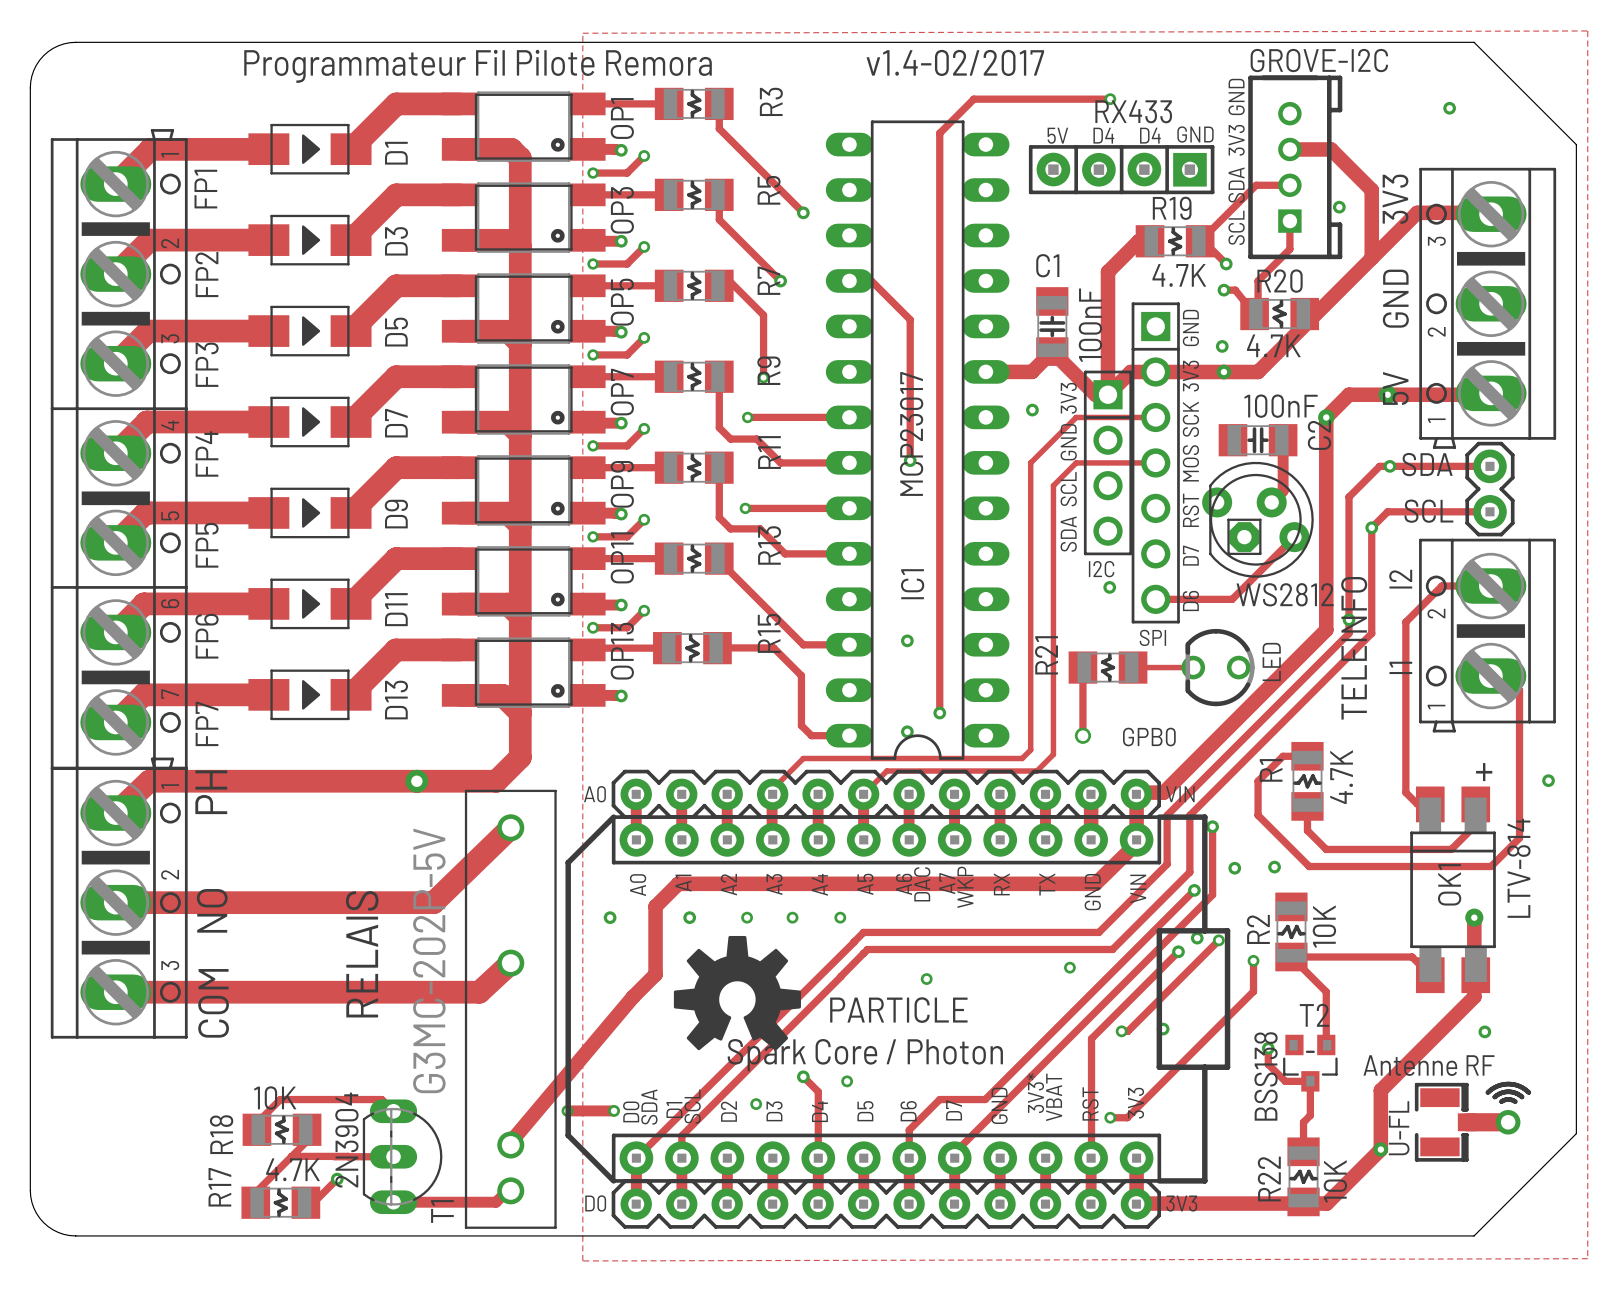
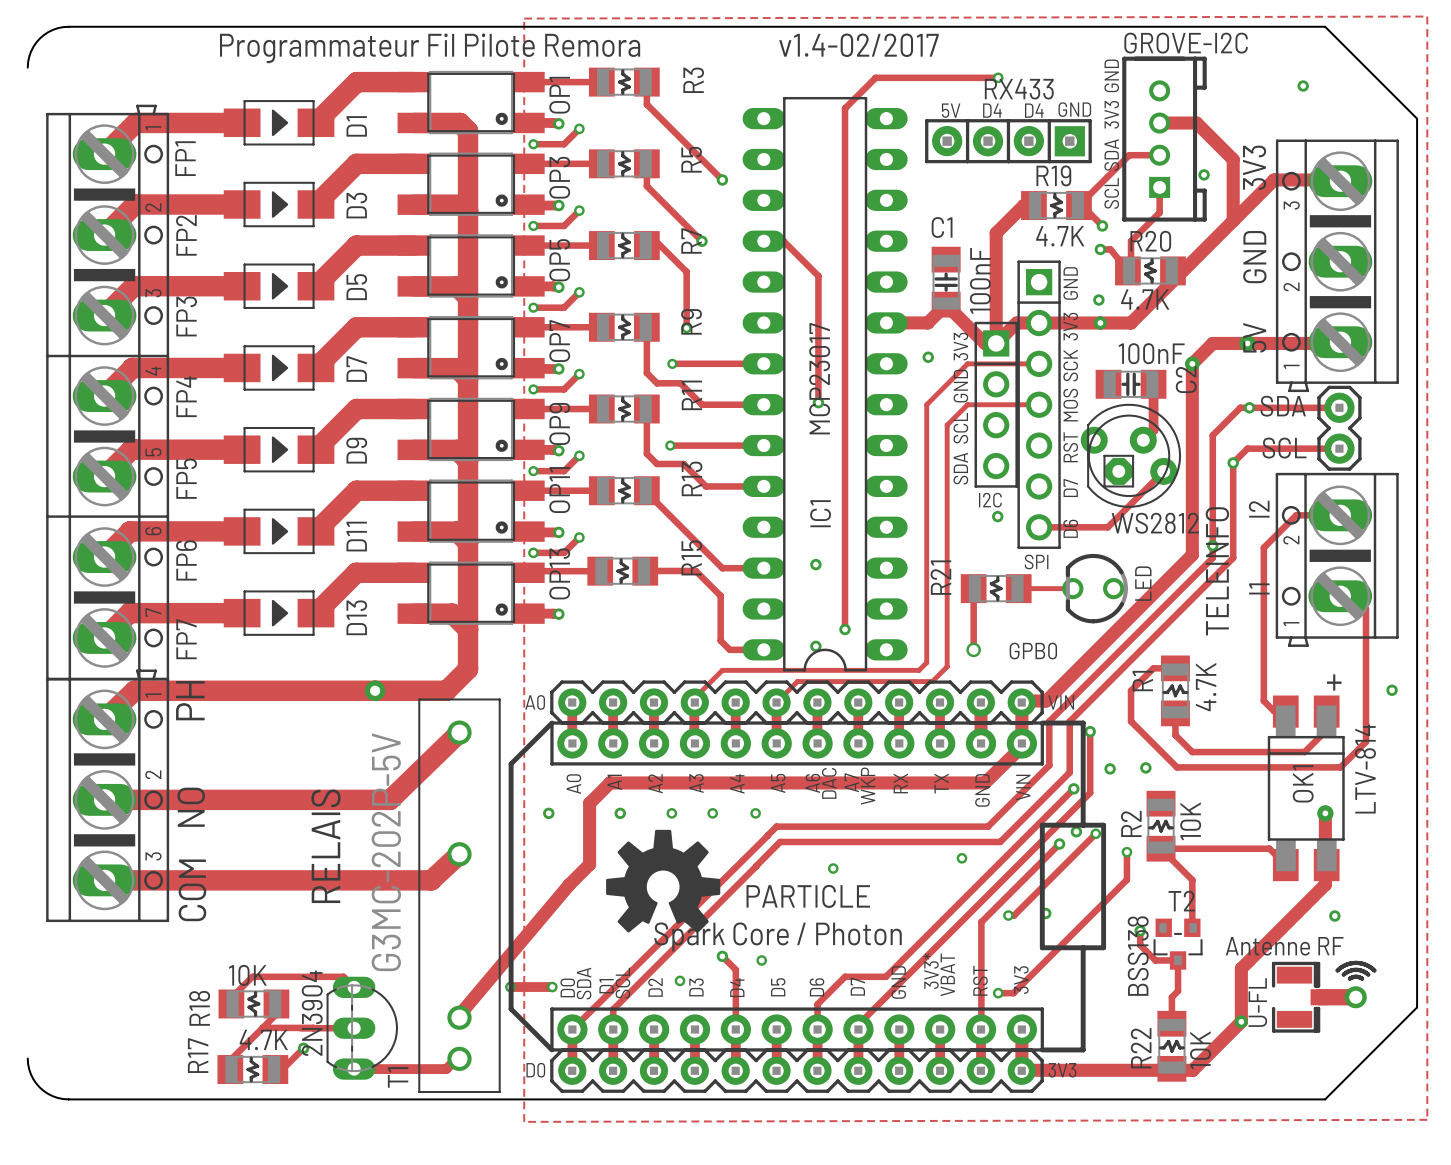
board edge: (30, 87) (30, 1190) -> none

